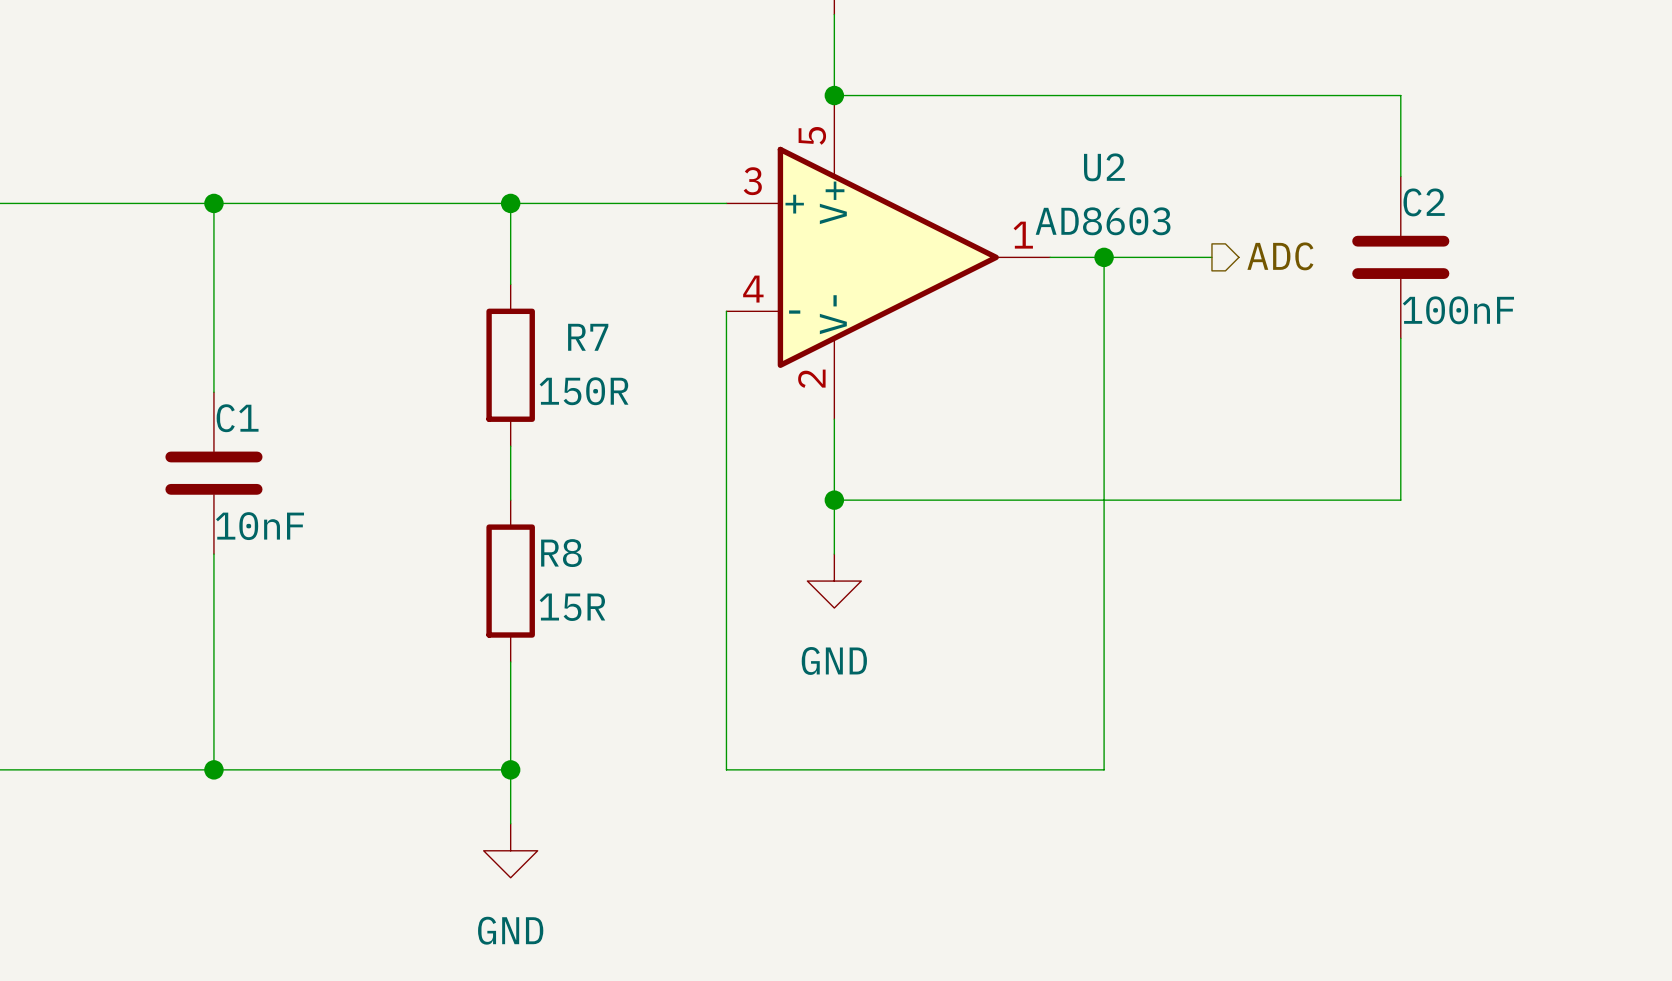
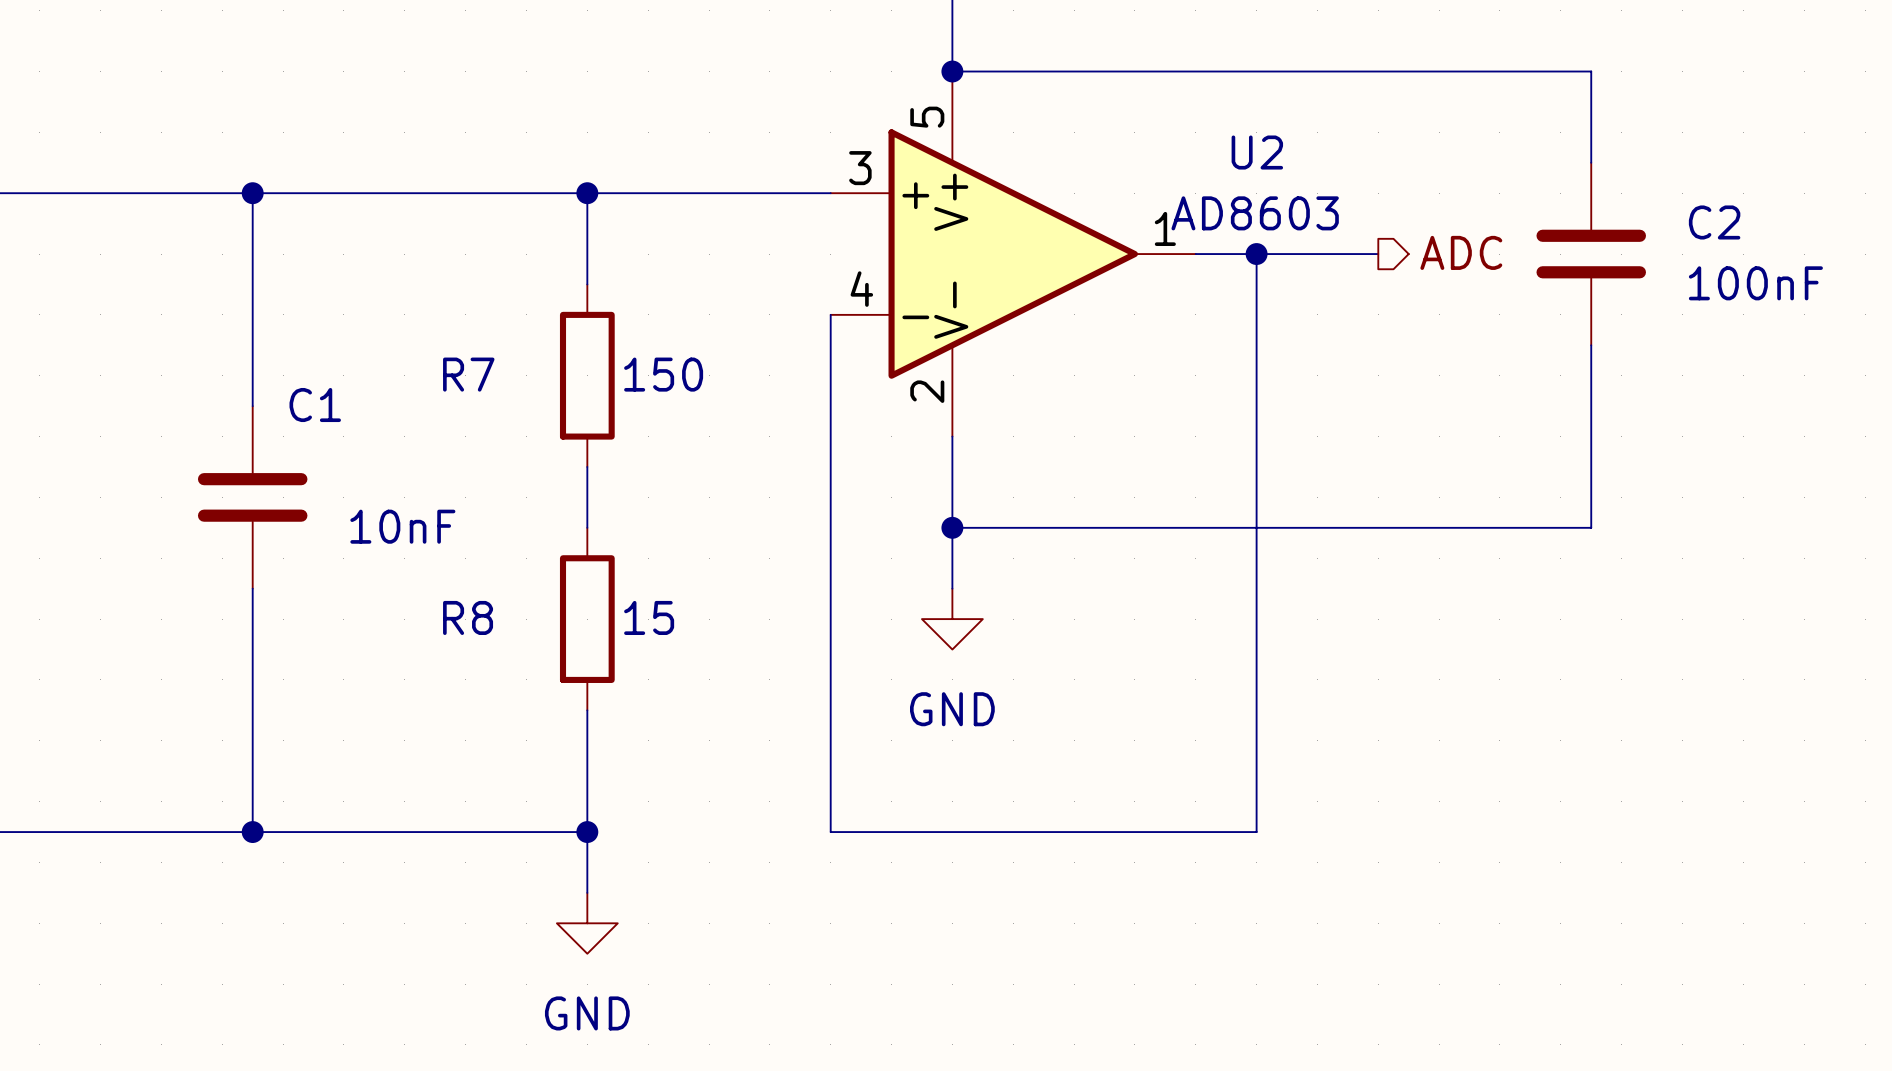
C2 name position: C2 (1424, 202) -> C2 (1714, 222)
C2 value position: 100nF (1458, 310) -> 100nF (1755, 283)
R7 name position: R7 (588, 337) -> R7 (468, 374)
R7 value: 150R (584, 391) -> 150 (663, 374)
C1 name position: C1 (237, 418) -> C1 (315, 405)
C1 value position: 10nF (260, 526) -> 10nF (402, 526)
R8 name position: R8 (561, 553) -> R8 (468, 617)
R8 value: 15R (572, 607) -> 15 (649, 617)

